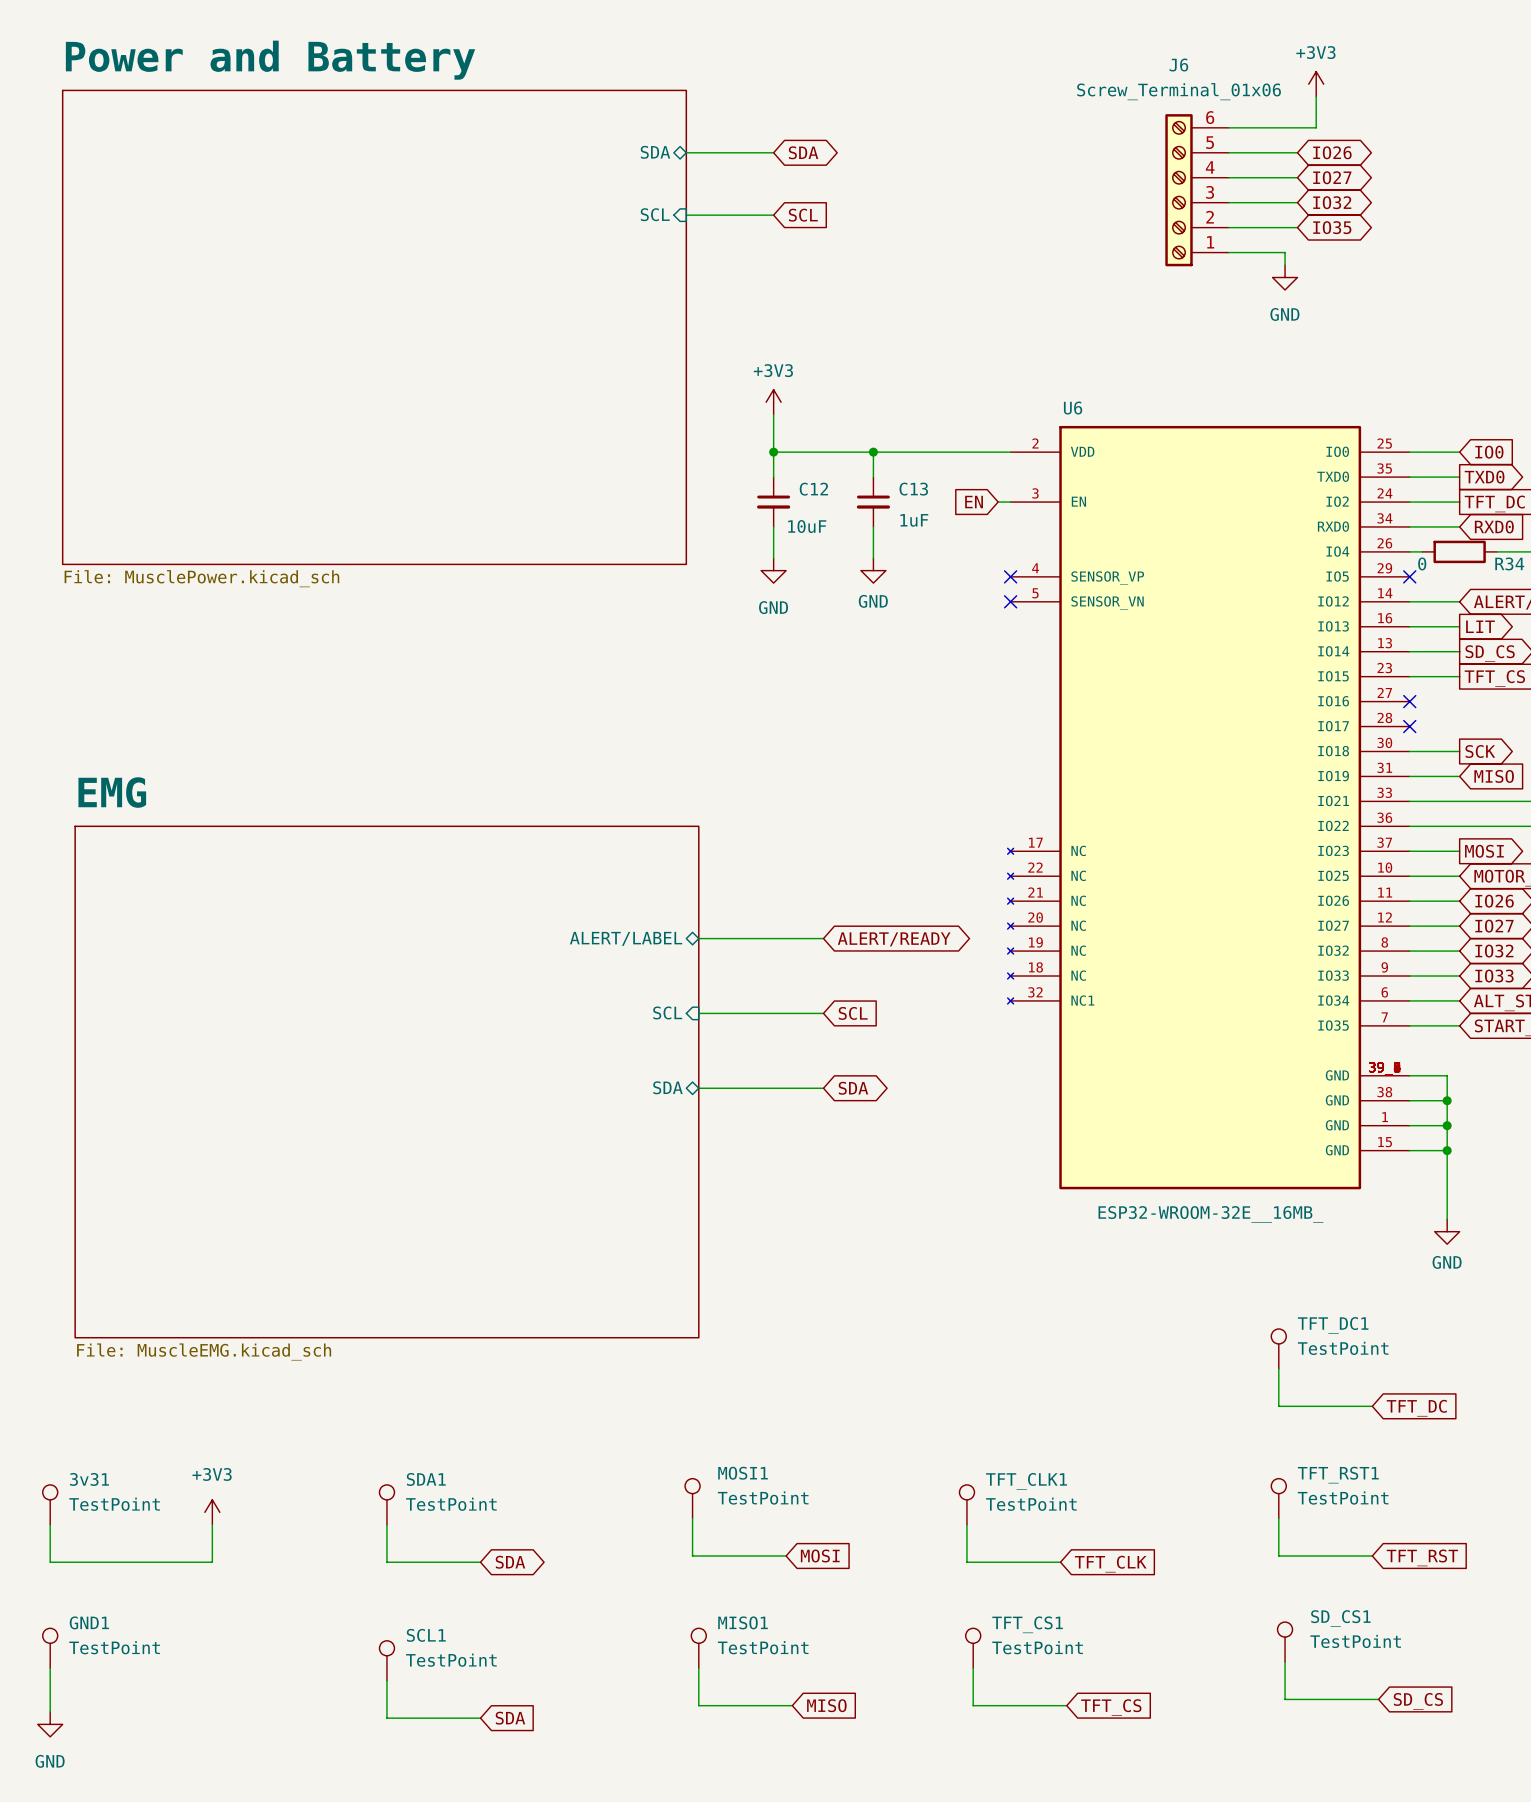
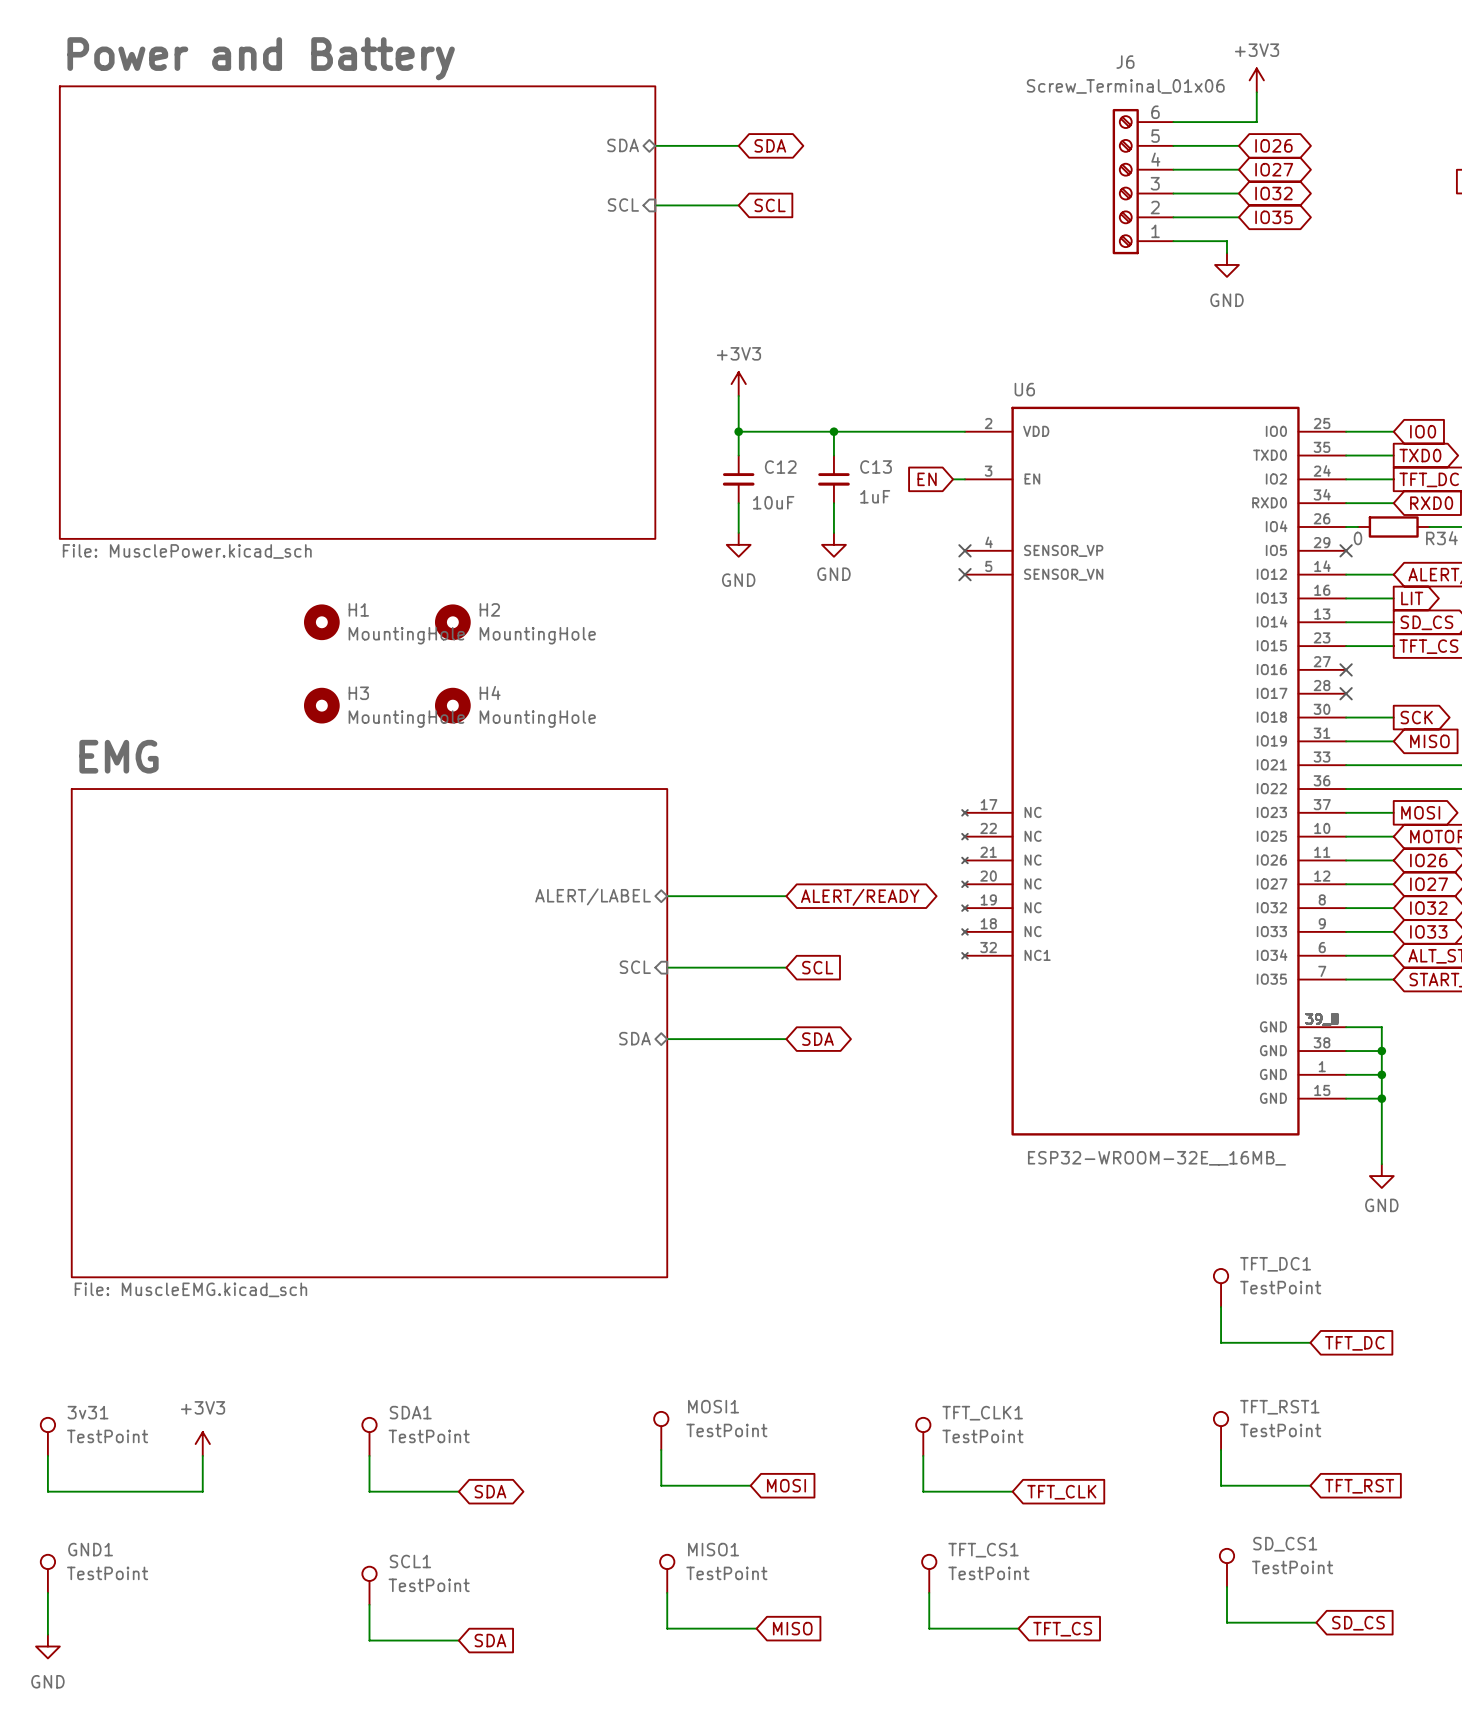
H1: none -> MountingHole (321, 622)
H2: none -> MountingHole (452, 622)
H3: none -> MountingHole (321, 705)
H4: none -> MountingHole (452, 705)

